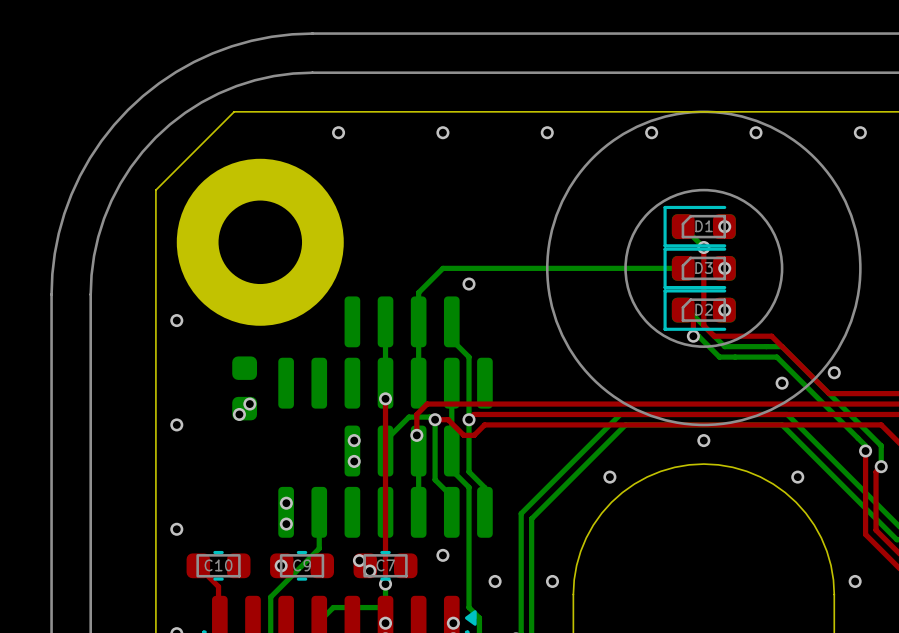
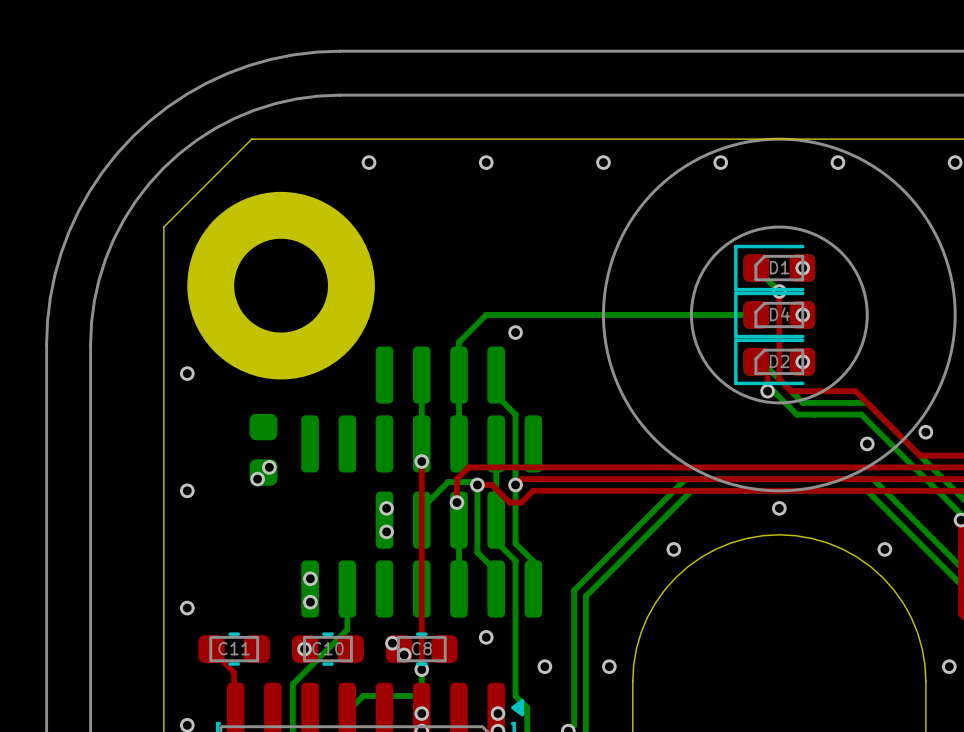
D3 name: D3 (704, 267) -> D4 (779, 314)
C10 name: C10 (218, 565) -> C11 (234, 648)
C9 name: C9 (302, 565) -> C10 (327, 648)
C7 name: C7 (385, 565) -> C8 (421, 648)

